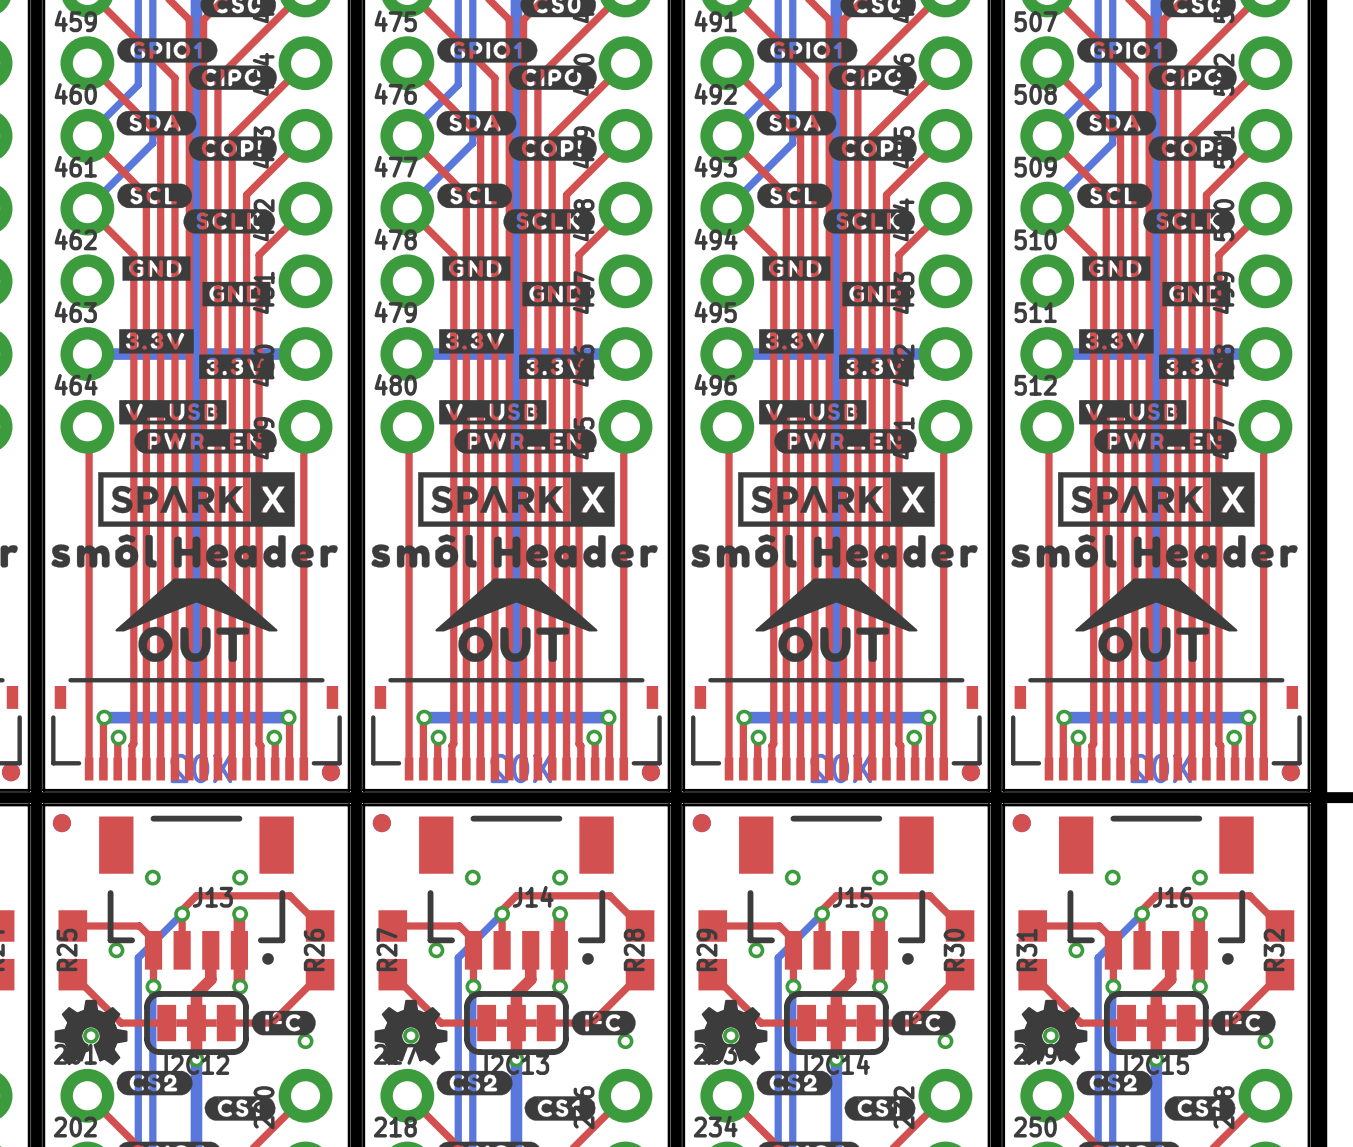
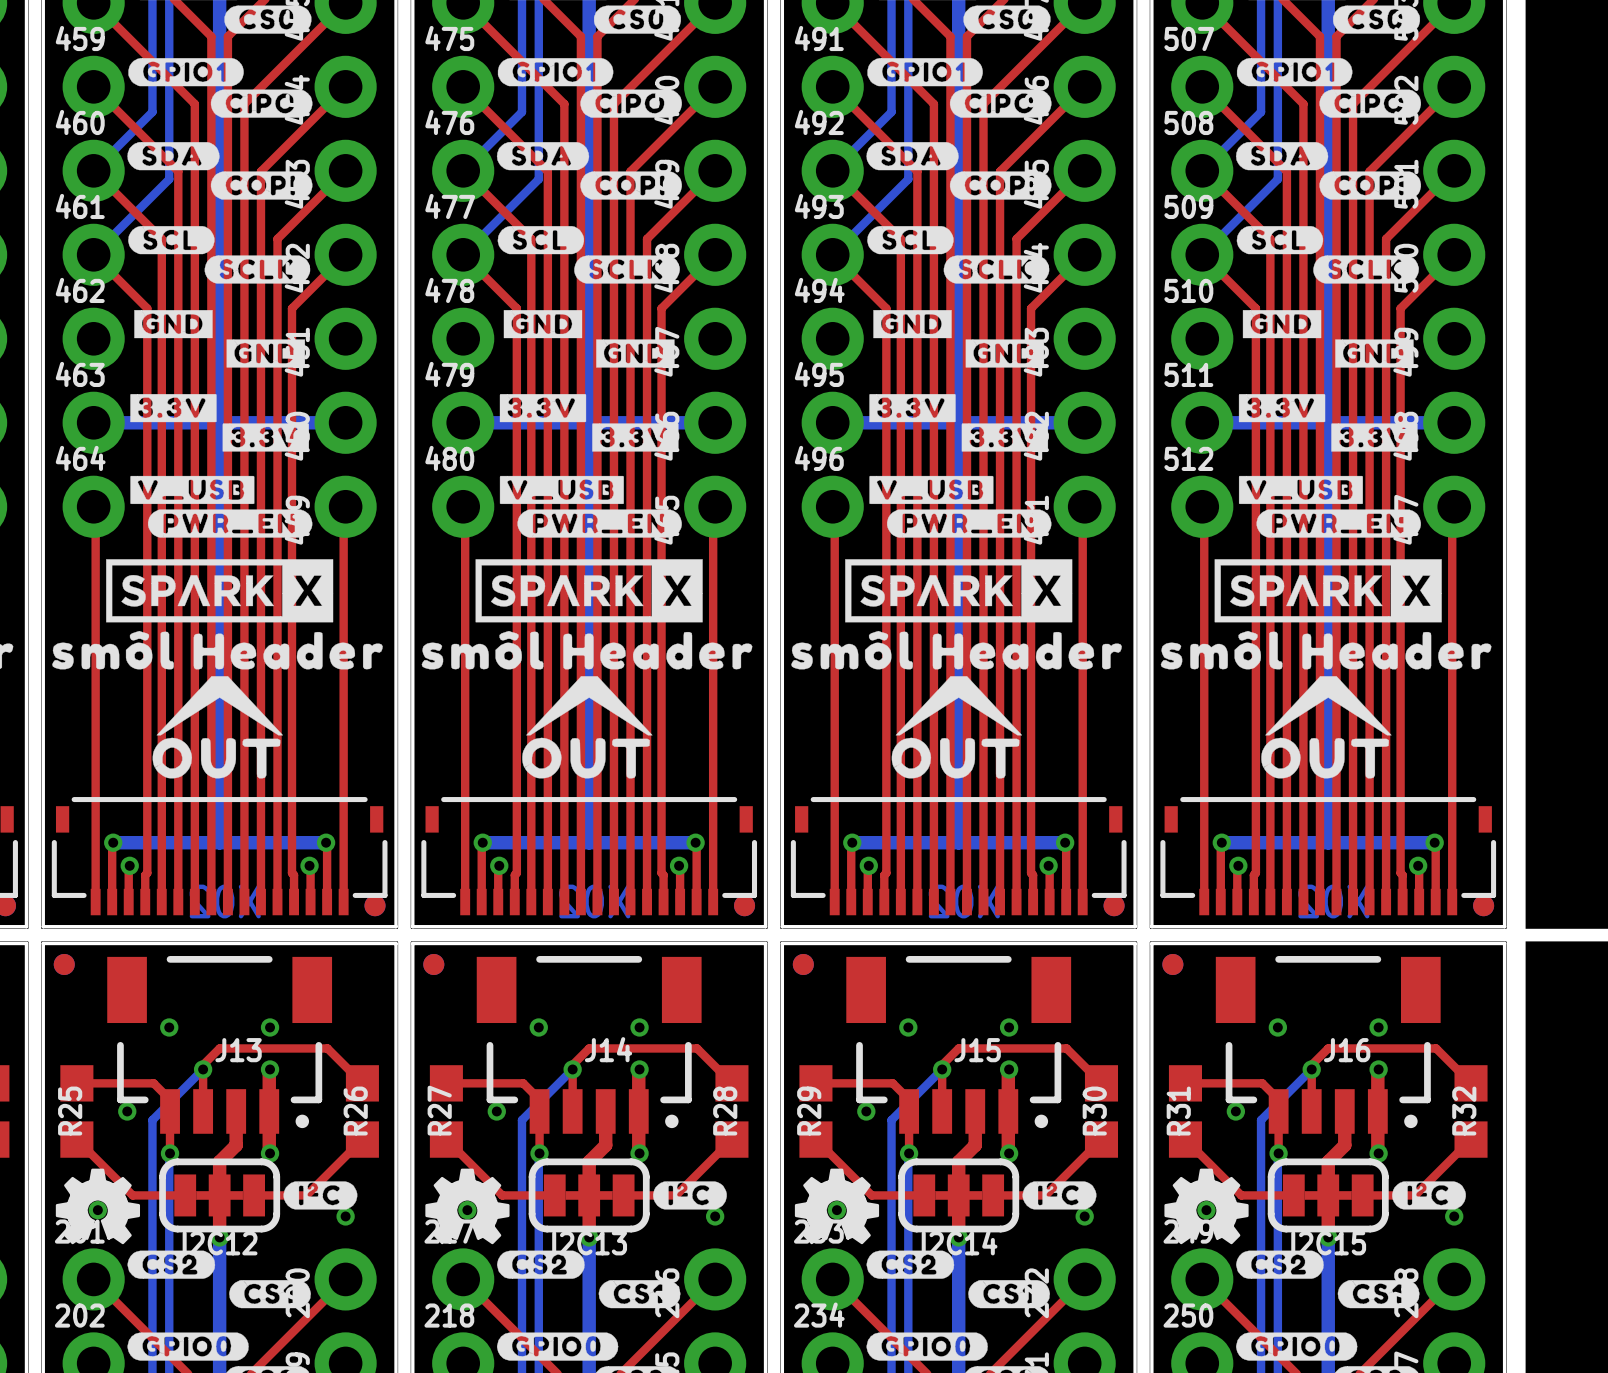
drawing shape: [115, 578, 278, 632] -> [156, 676, 283, 736]
drawing shape: [435, 578, 598, 632] -> [526, 676, 653, 736]
drawing shape: [755, 578, 918, 632] -> [895, 676, 1023, 736]
drawing shape: [1075, 578, 1238, 632] -> [1265, 676, 1392, 736]

